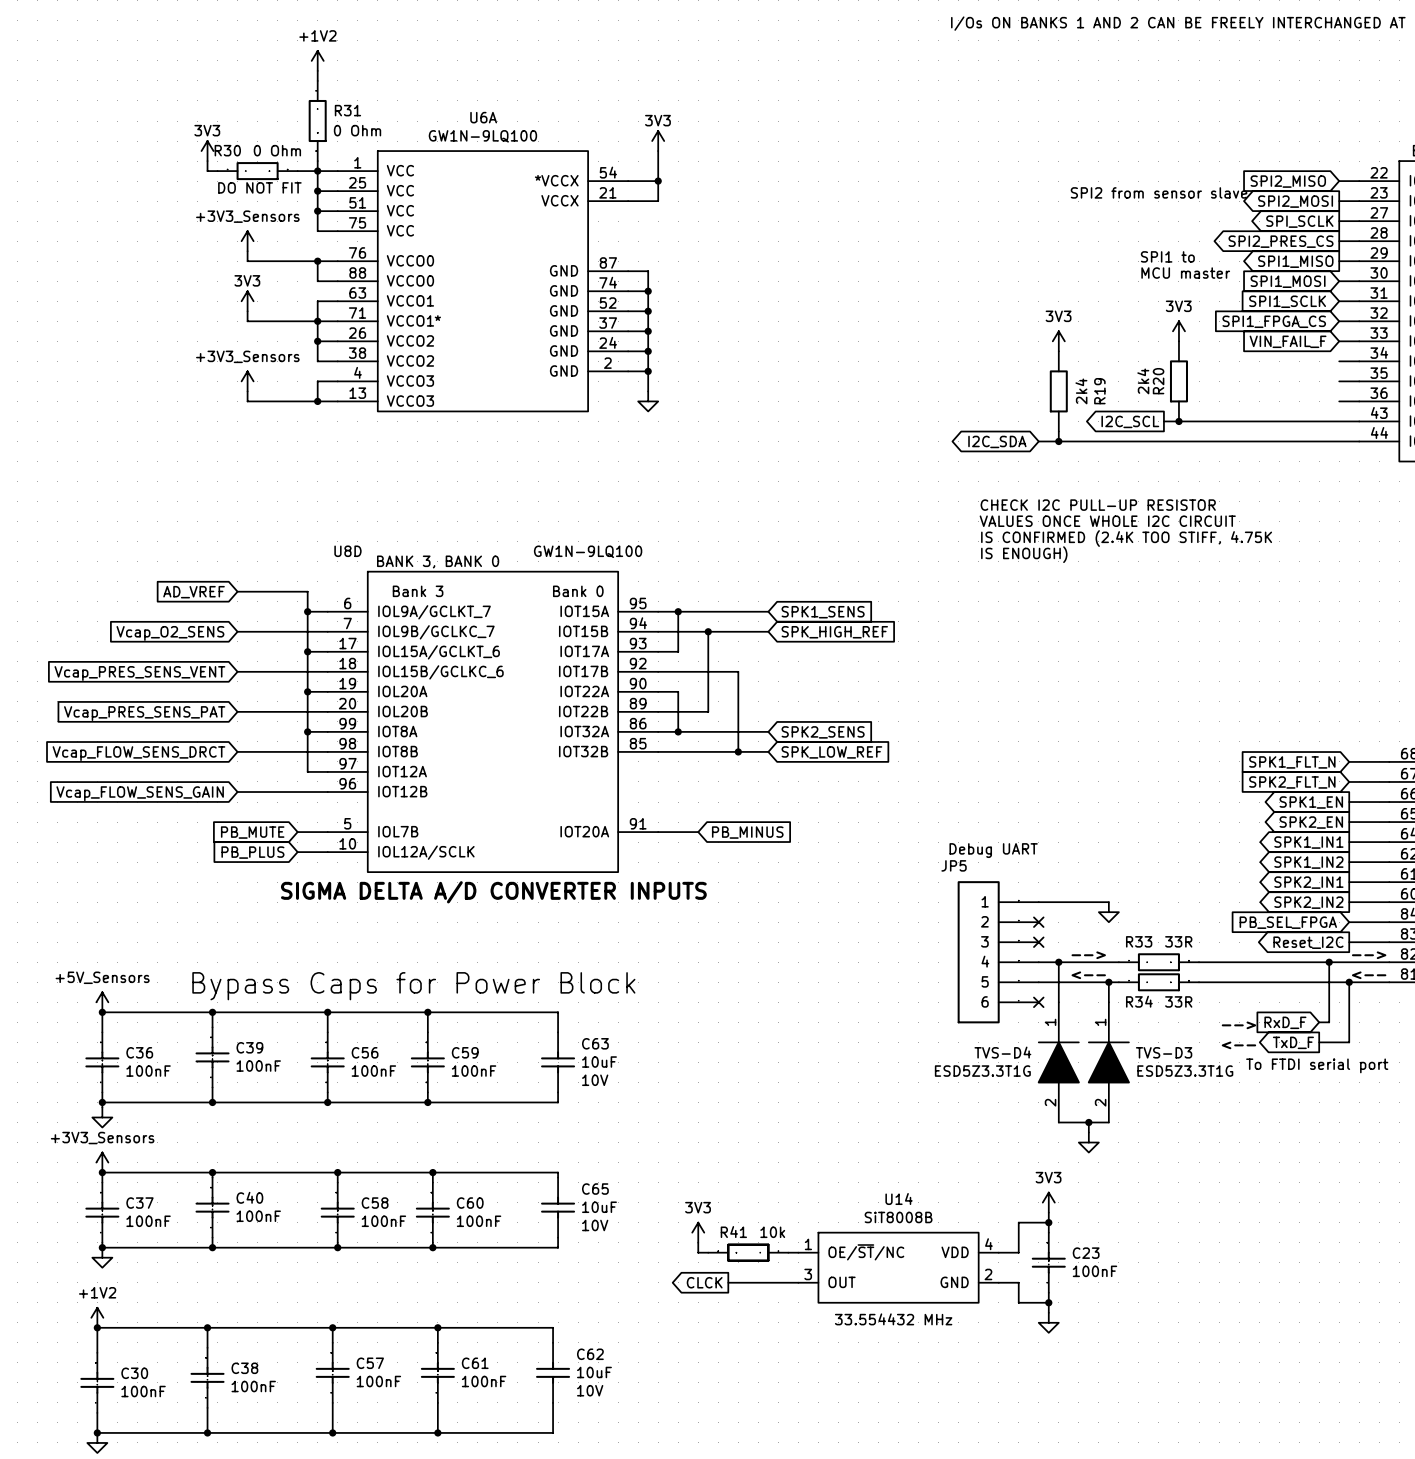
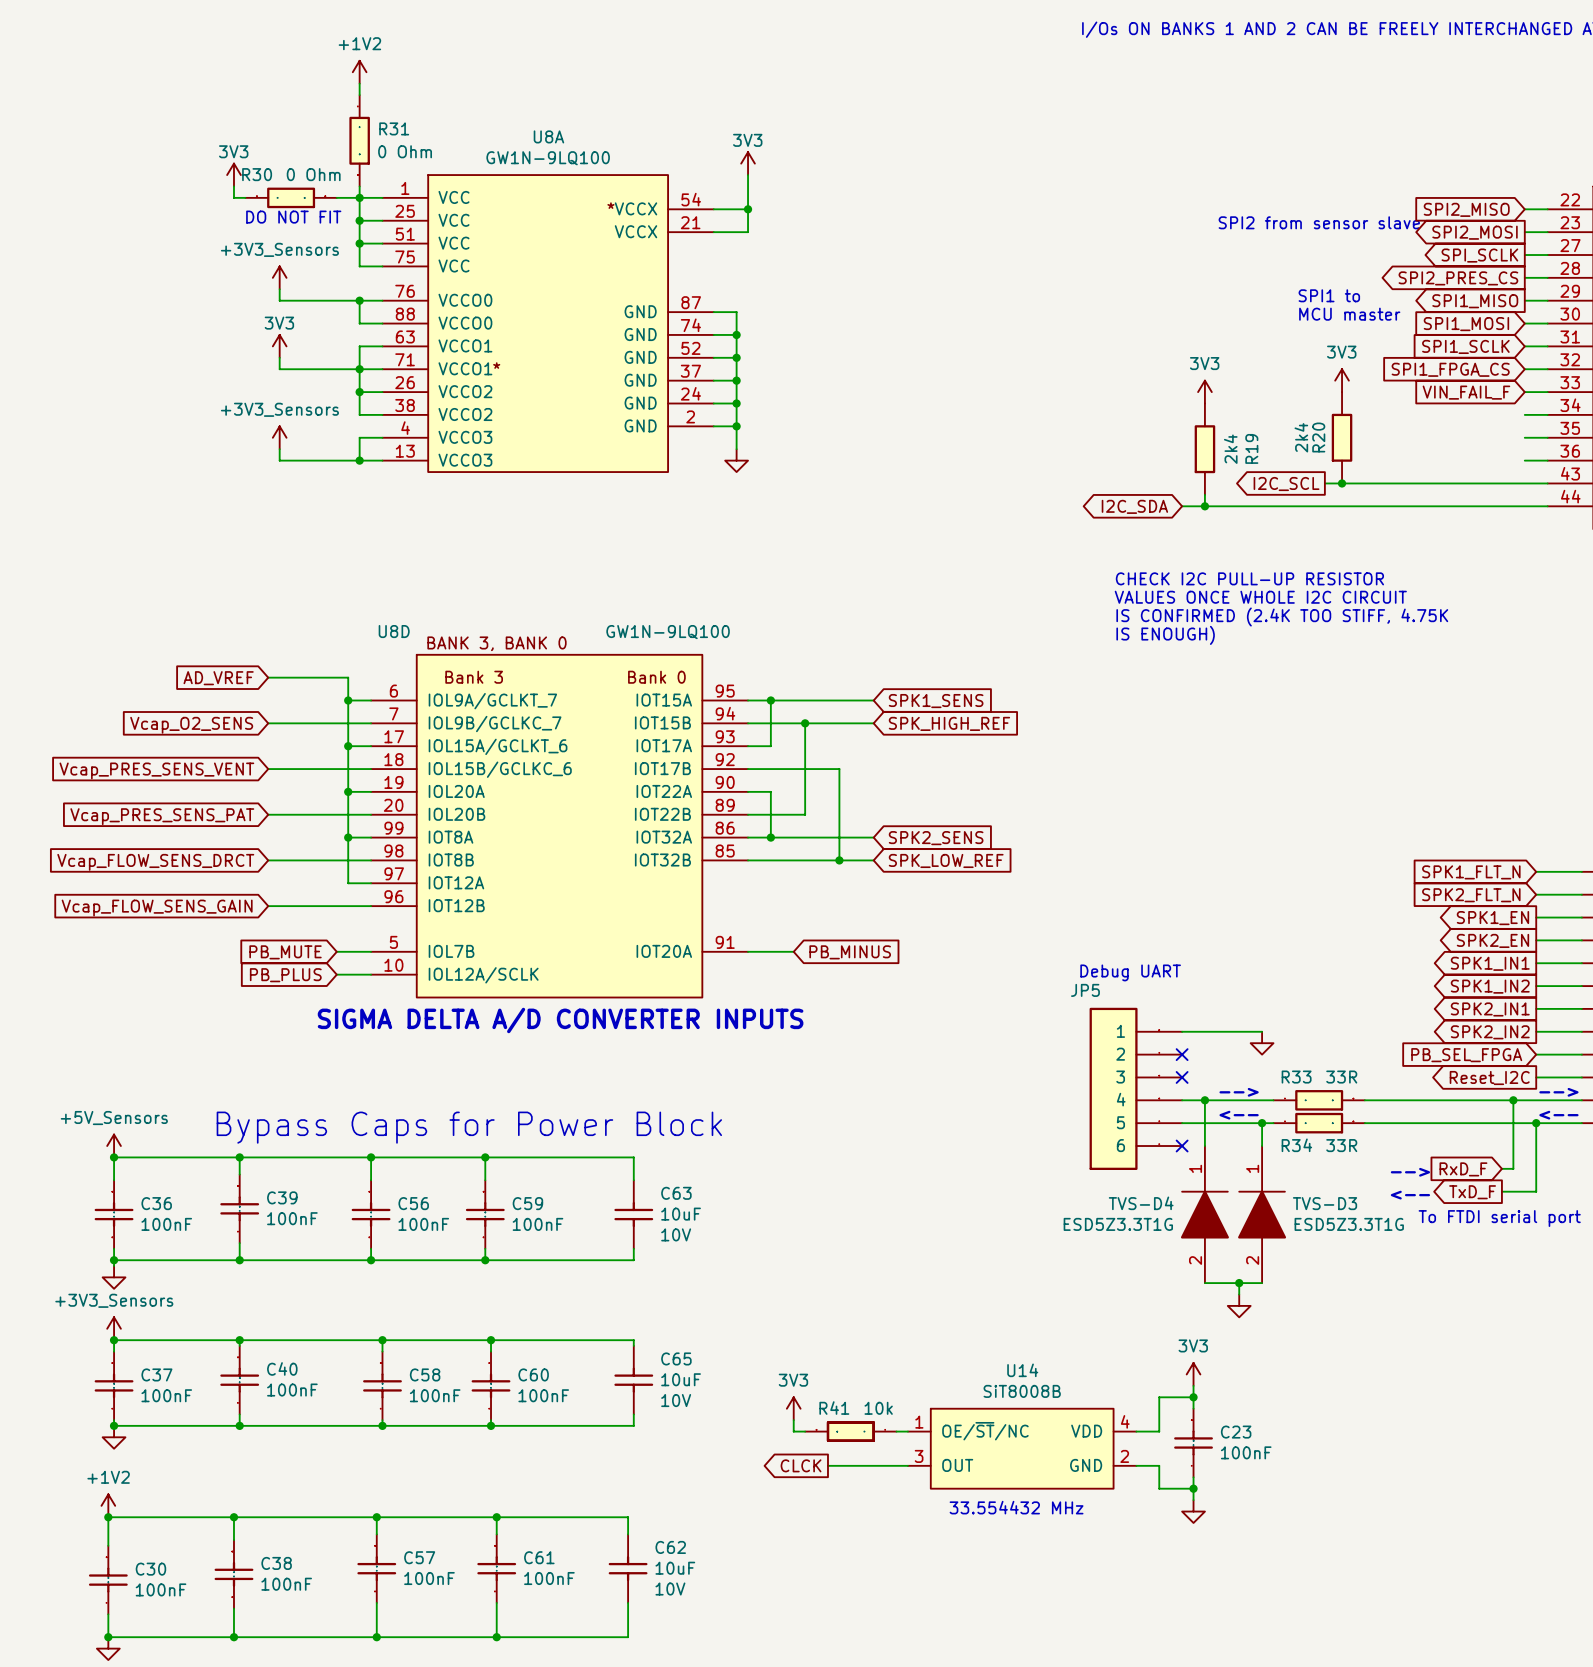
U6A name: U6A (483, 117) -> U8A (548, 136)

